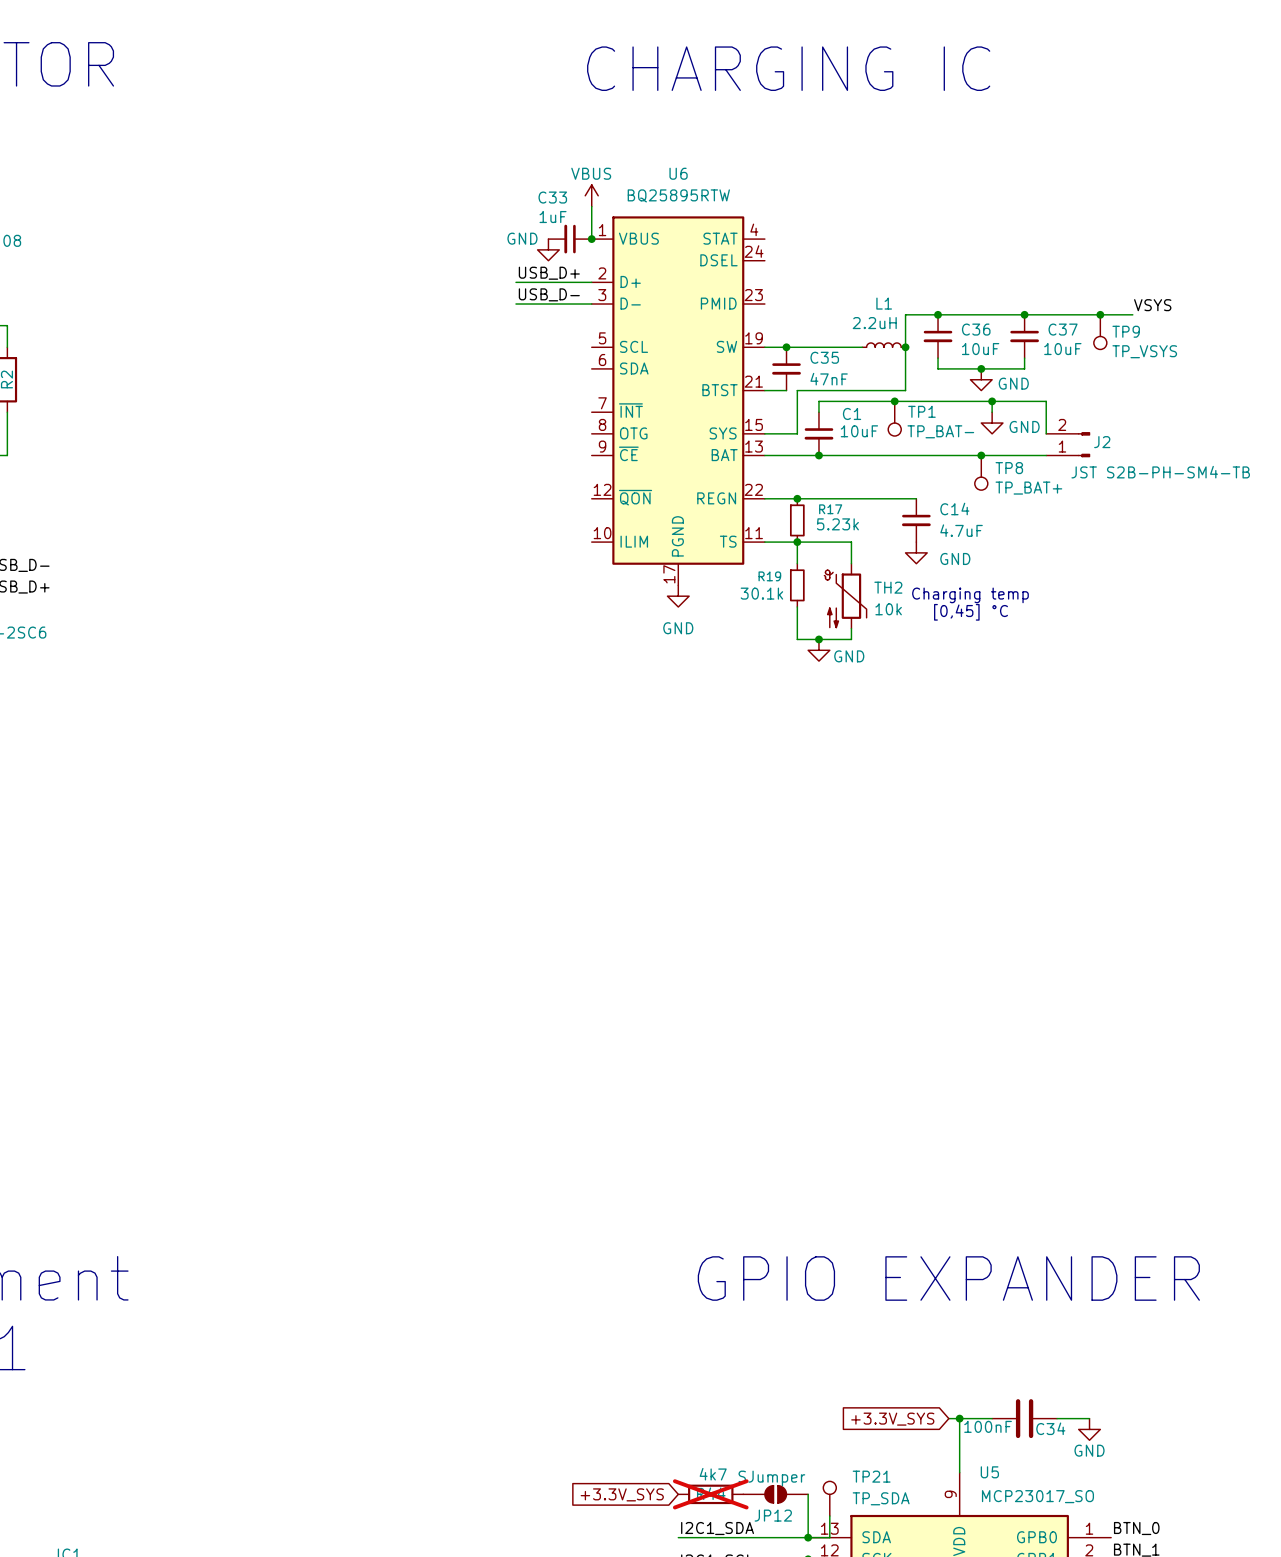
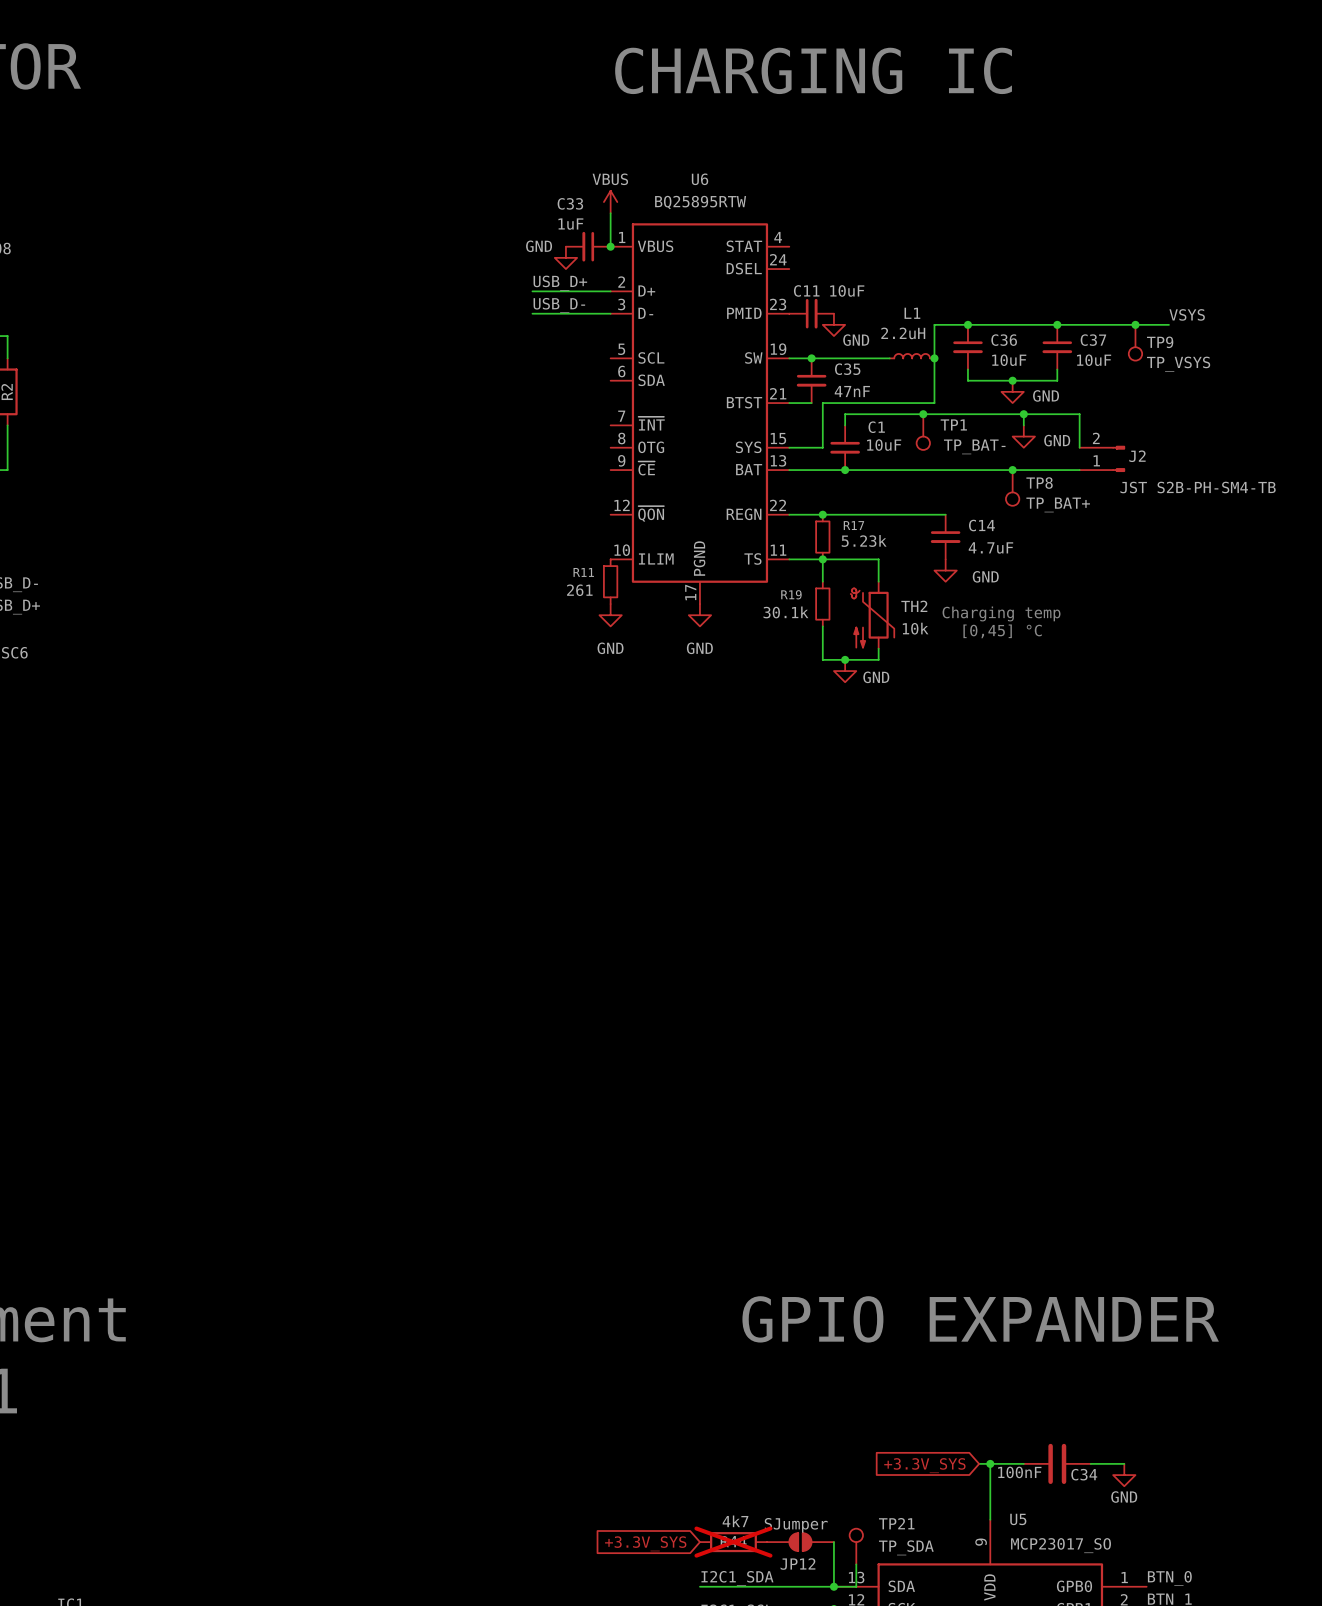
C11: none -> 10uF (811, 313)
power symbol: none -> GND (833, 324)
R11: none -> 261 (610, 581)
power symbol: none -> GND (610, 615)

